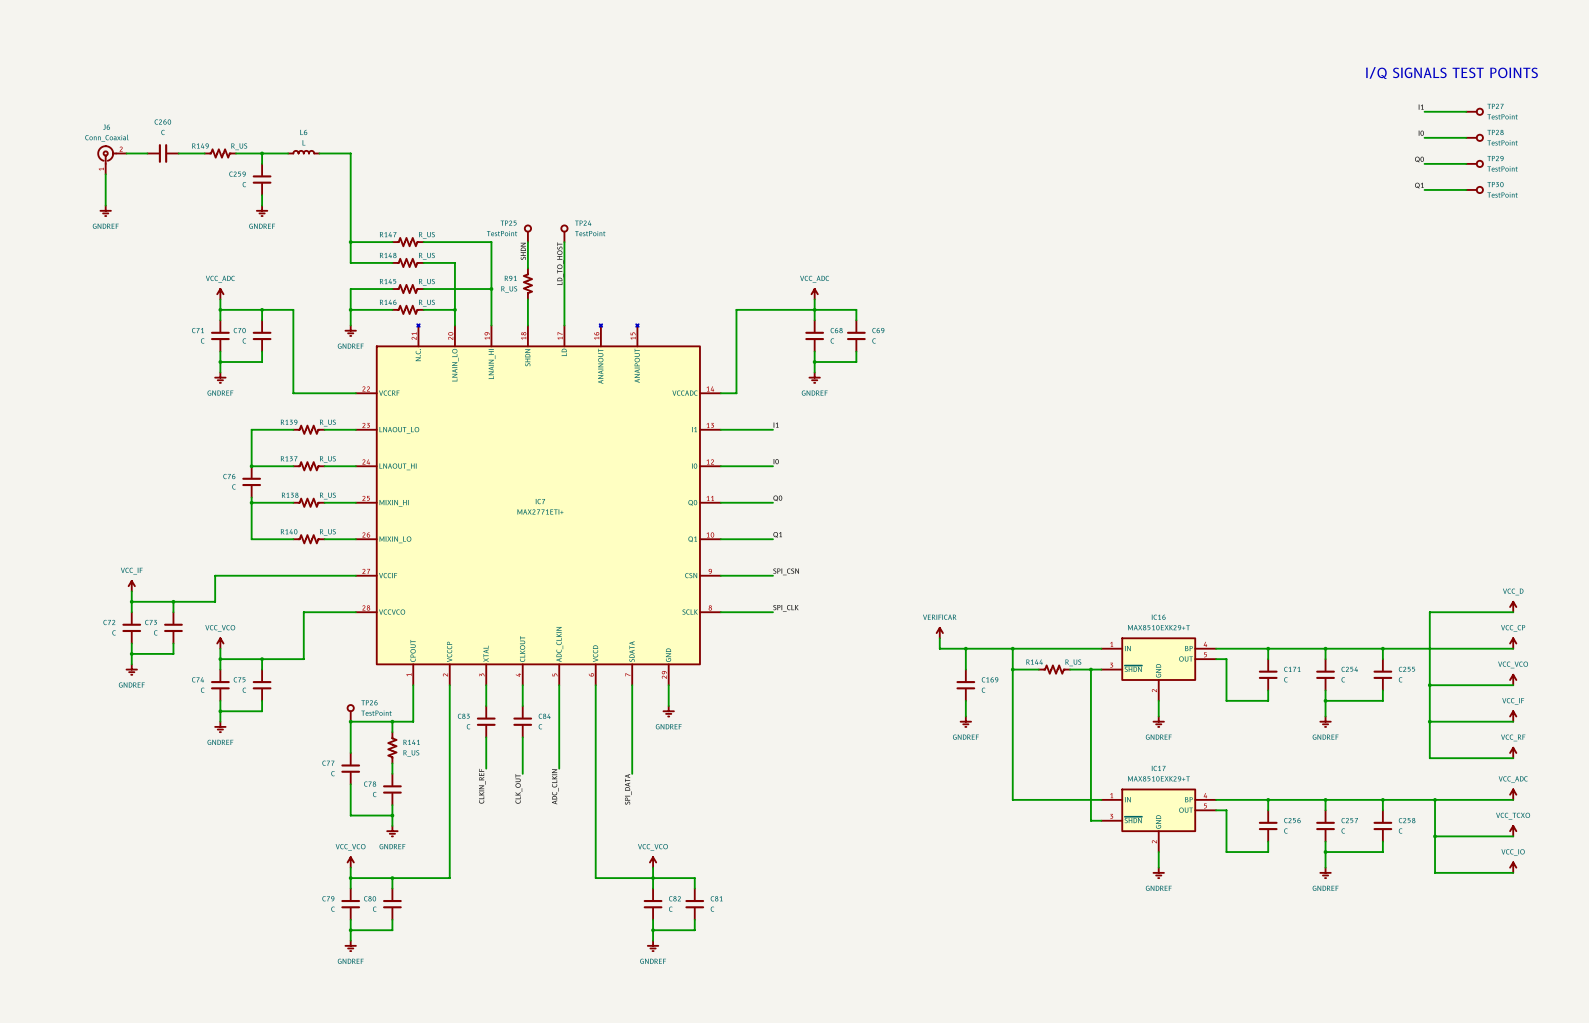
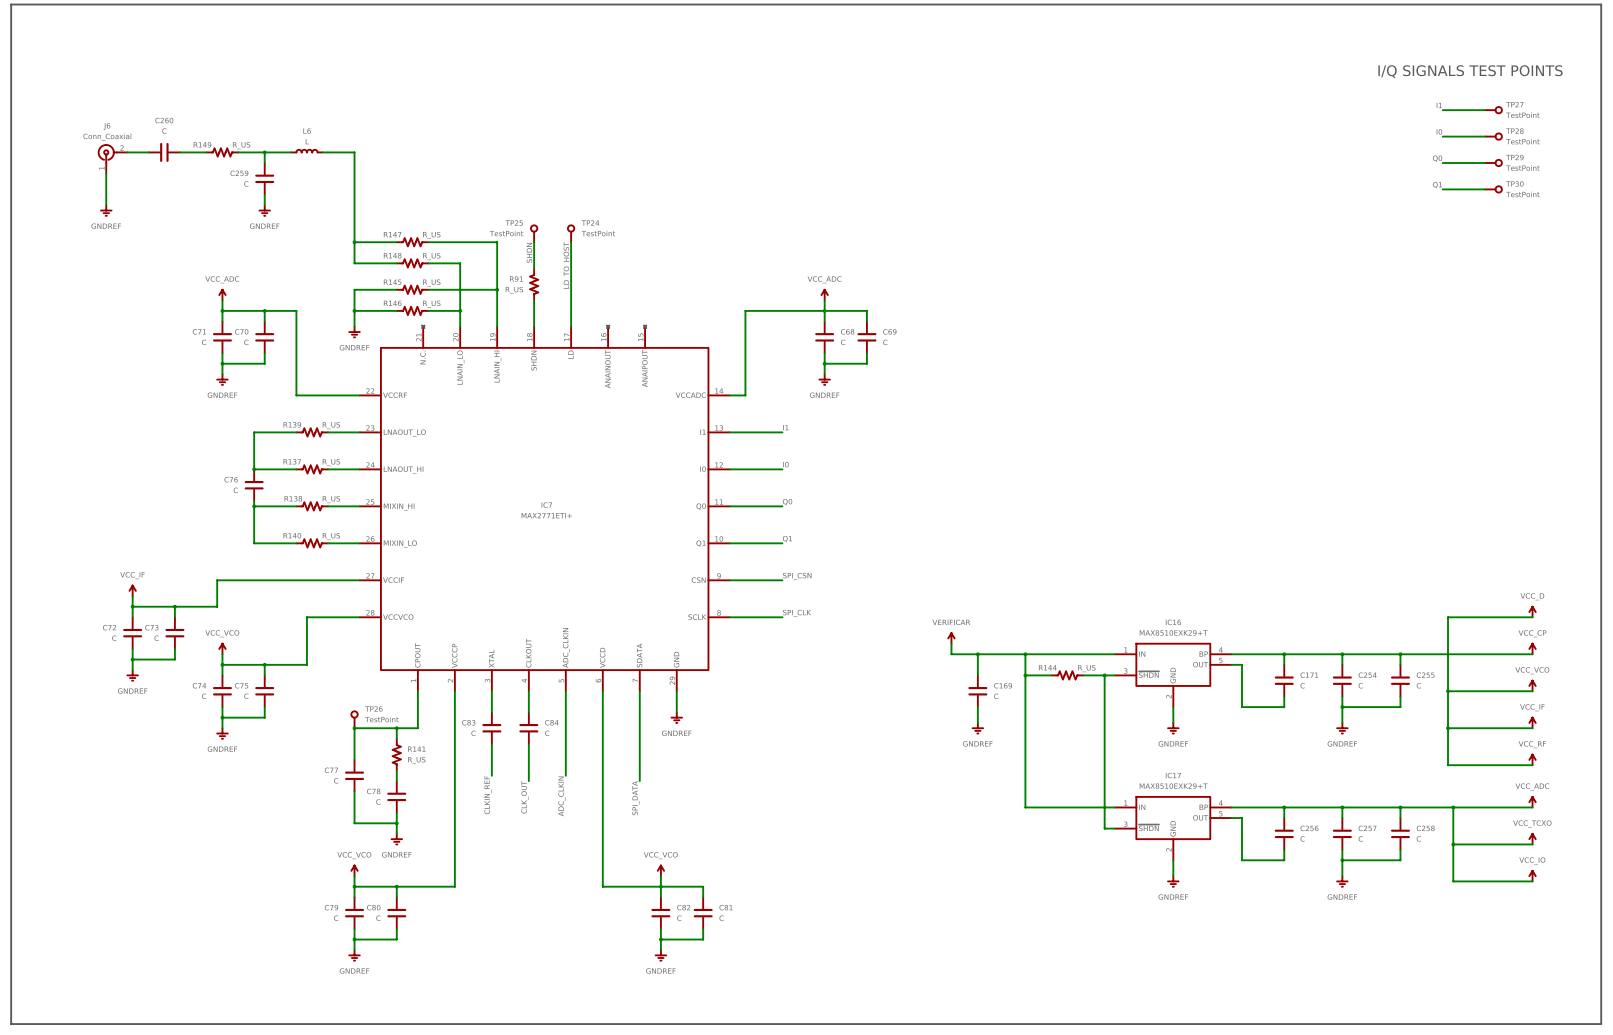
line: none -> (11, 4) (1601, 4) (1601, 1024) (11, 1024) (11, 4)

